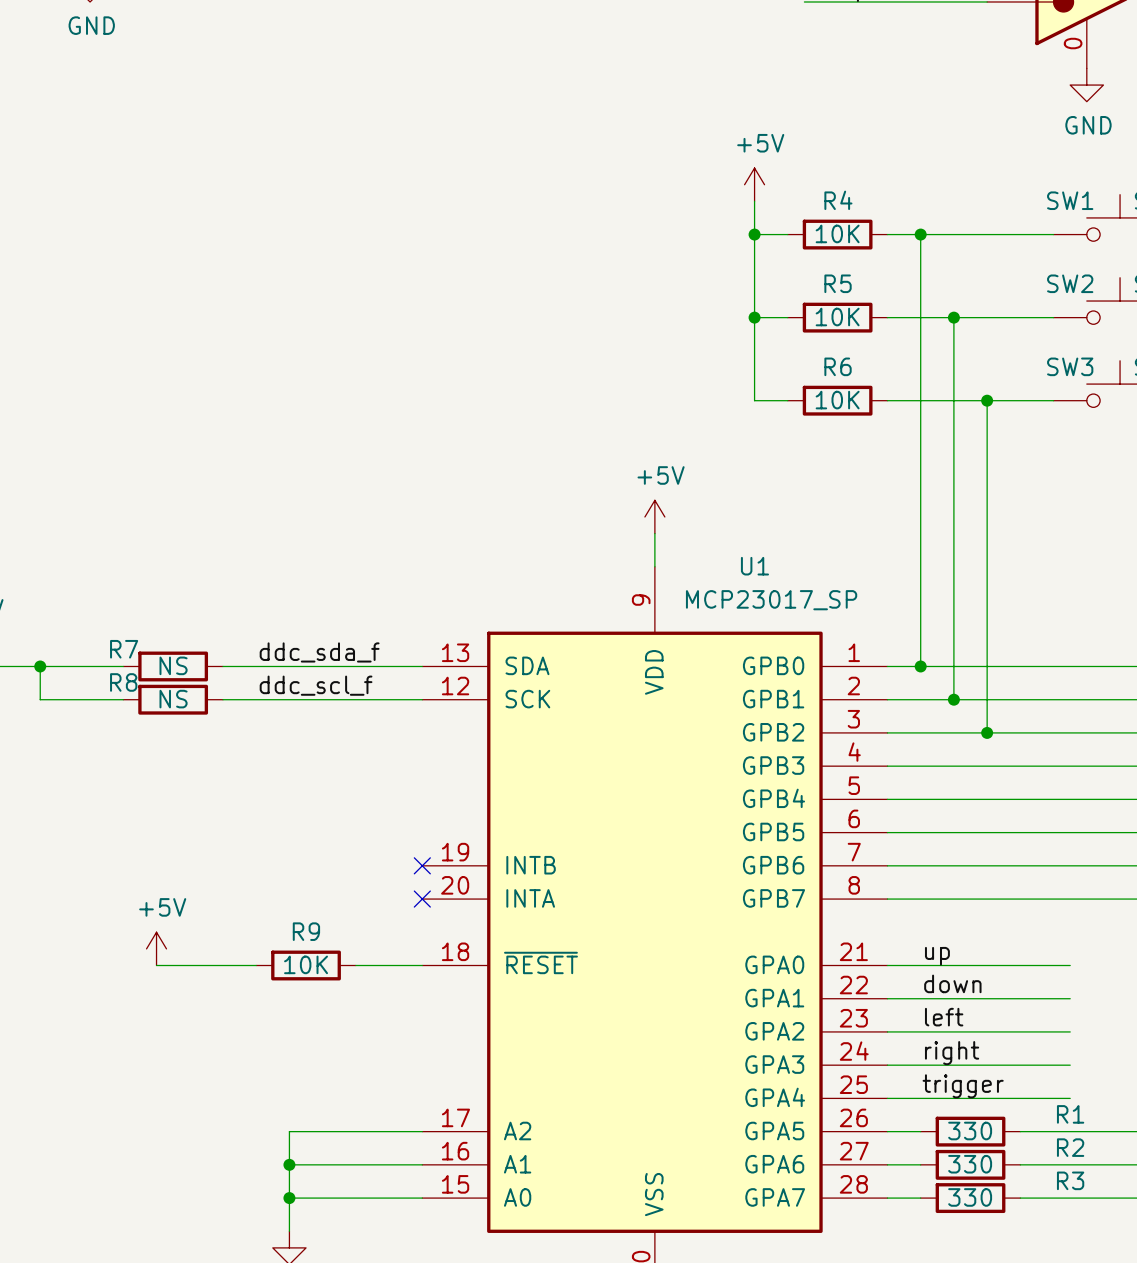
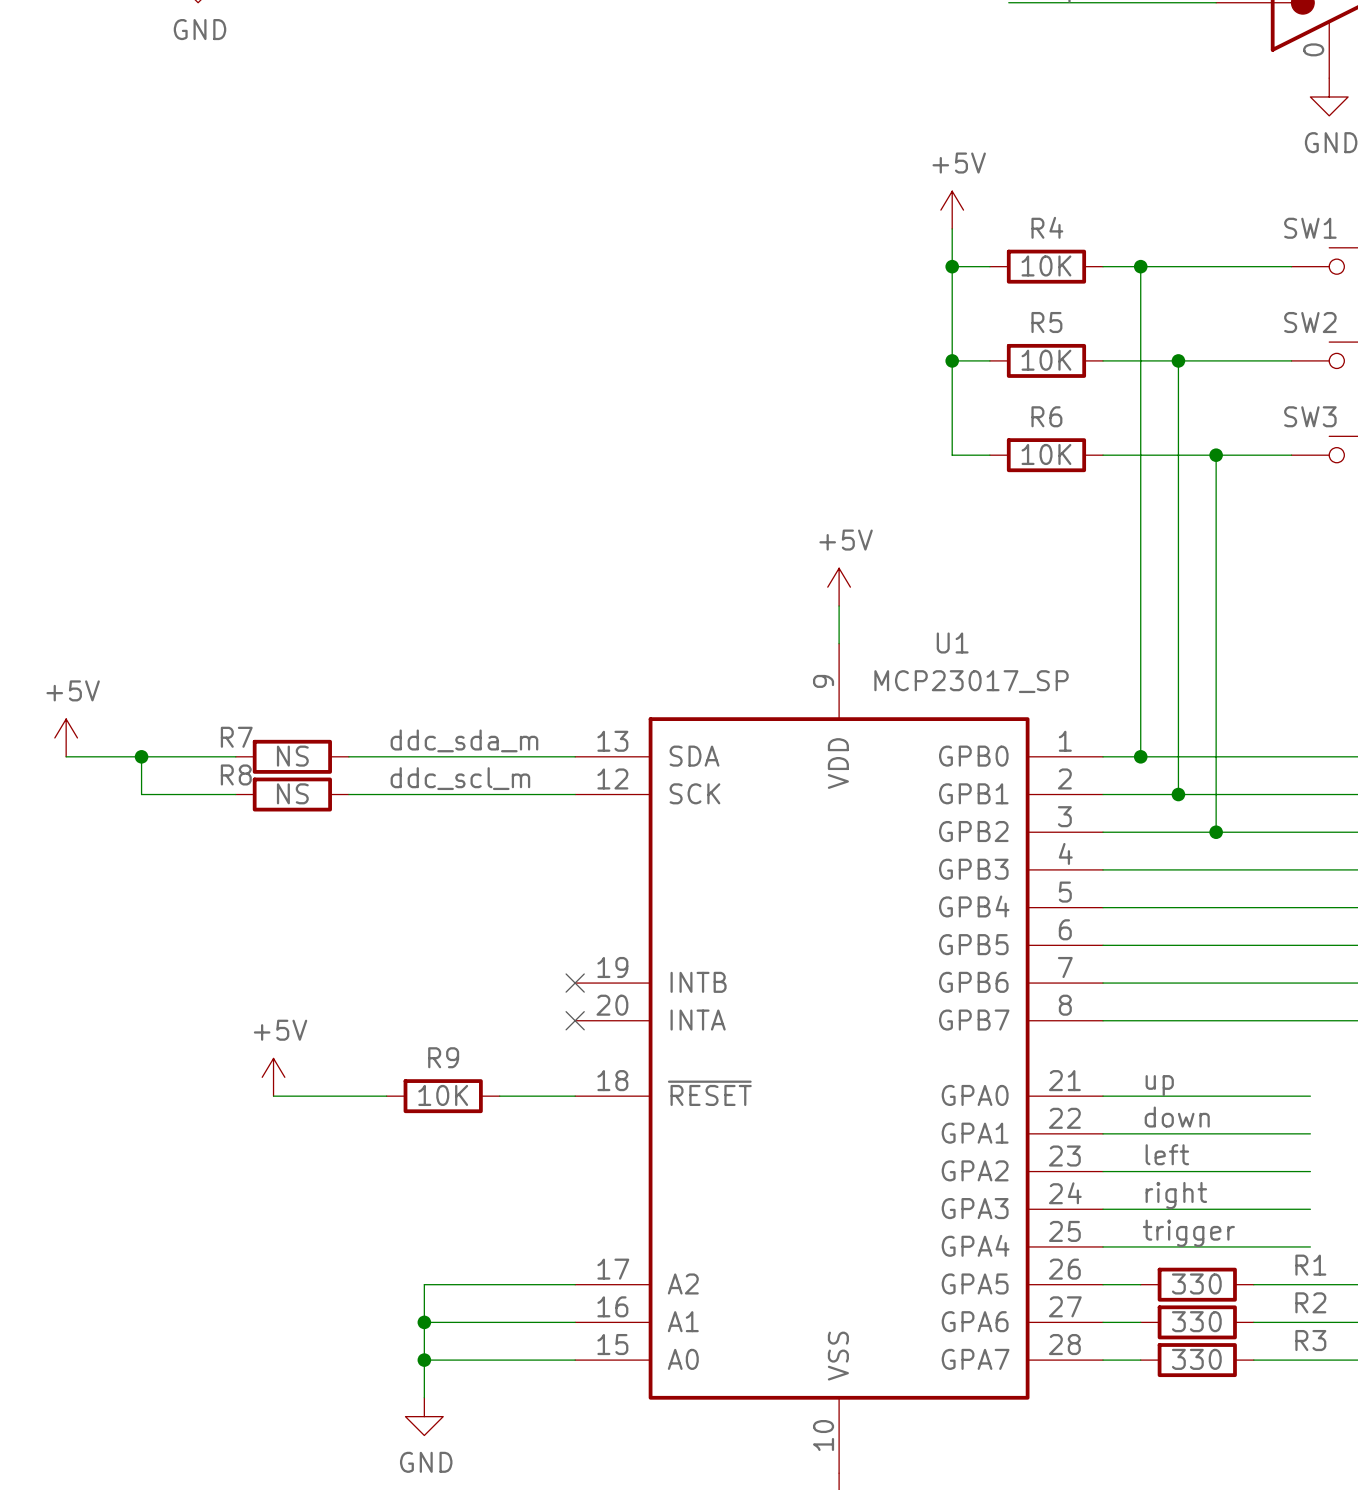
label: ddc_sda_f (319, 652) -> ddc_sda_m (464, 740)
label: ddc_scl_f (316, 685) -> ddc_scl_m (460, 778)

